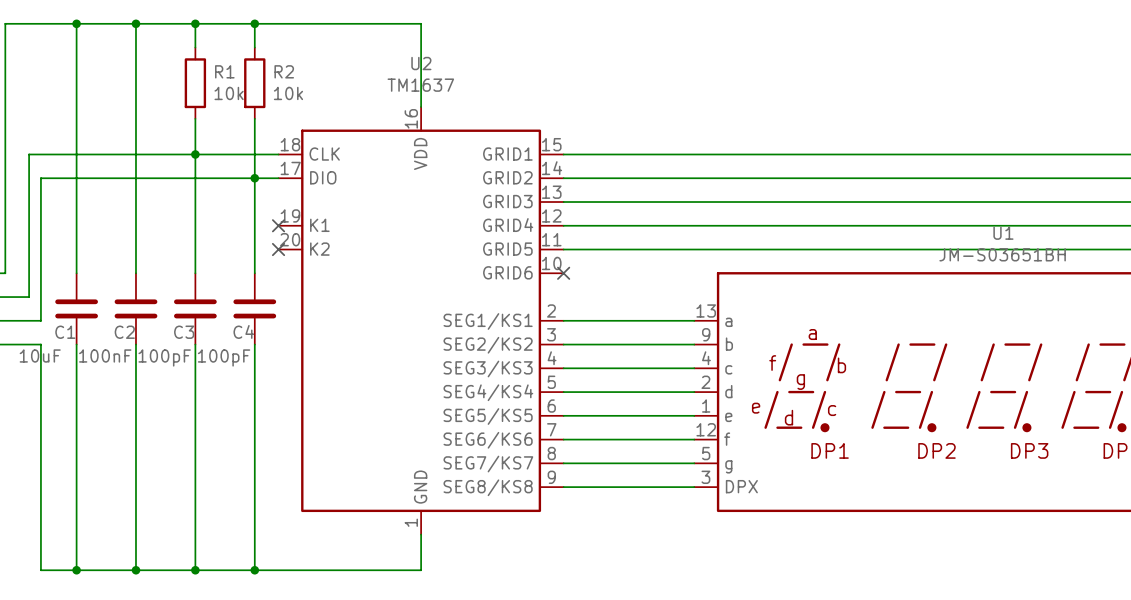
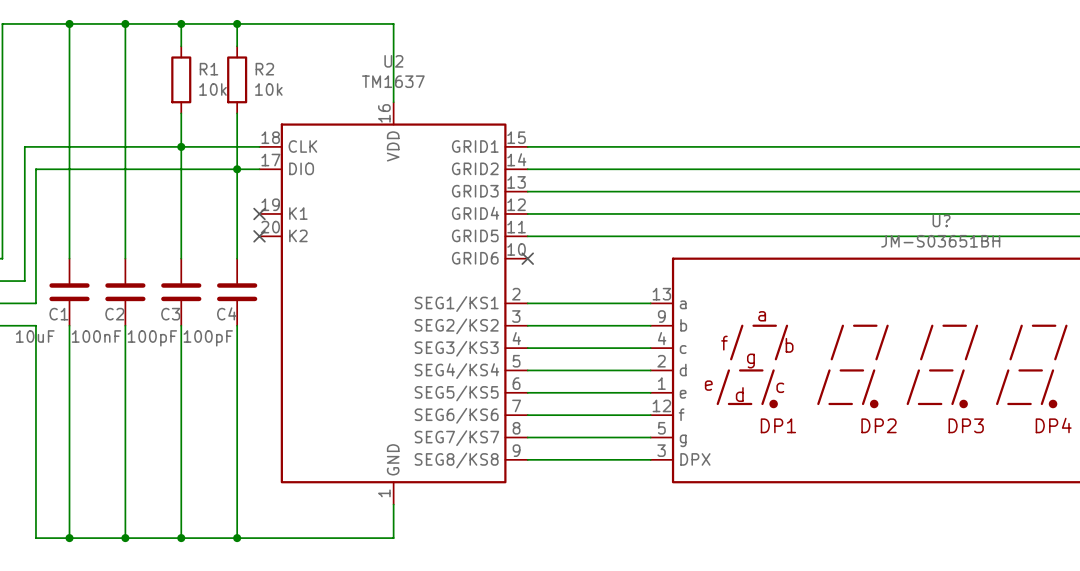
U1 name: U1 (1003, 233) -> U? (941, 220)

